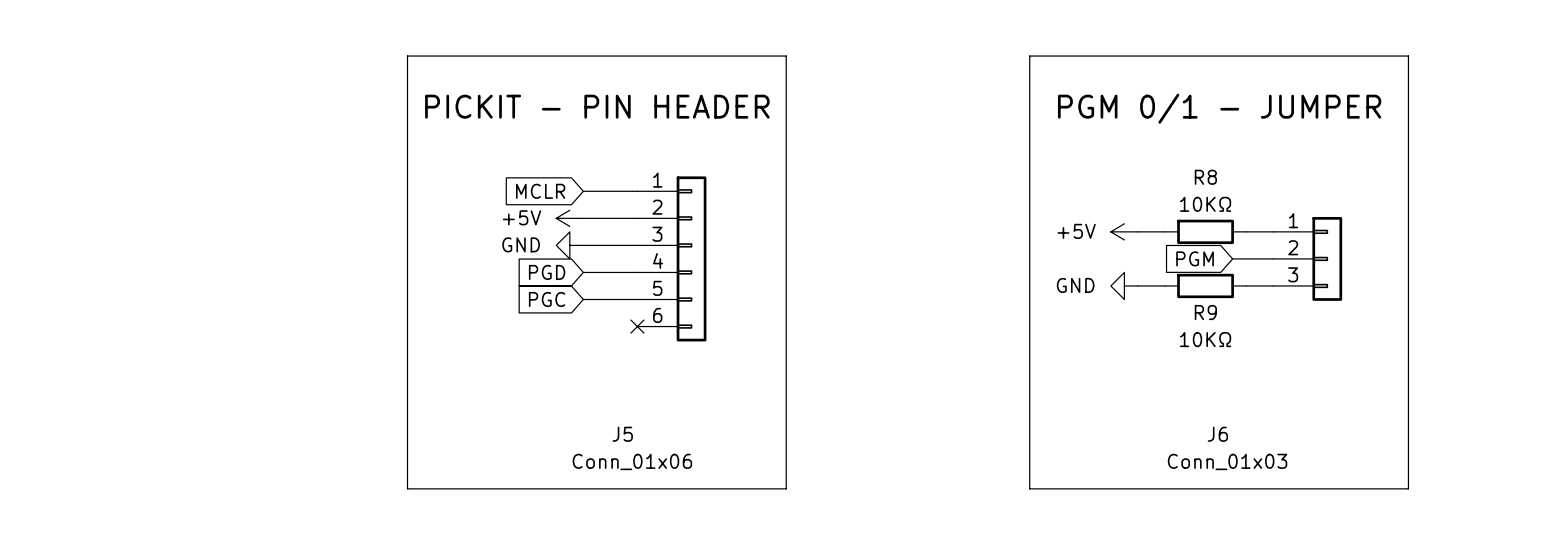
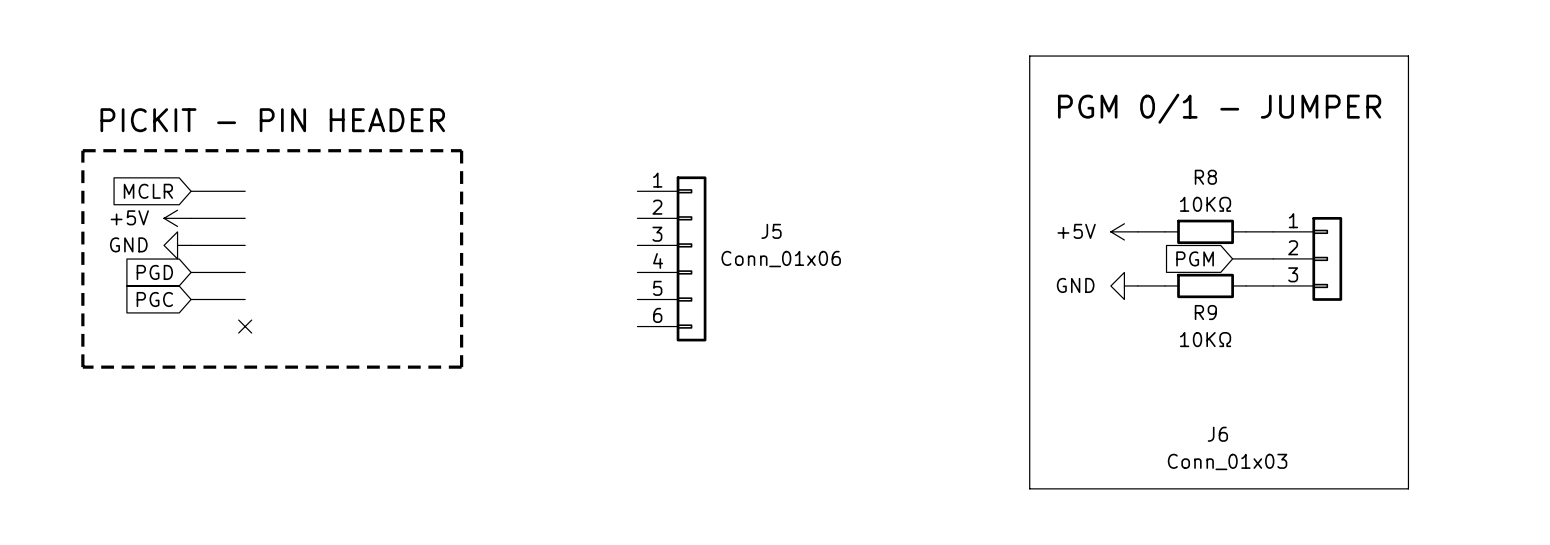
line: (407, 56) (786, 56) (786, 488) (407, 488) (407, 56) -> none
text: PICKIT - PIN HEADER (597, 106) -> none
text: none -> PICKIT - PIN HEADER (272, 120)
line: none -> (82, 150) (461, 150) (461, 367) (82, 367) (82, 150)
global label: none -> MCLR (148, 191)
wire: none -> (191, 191) (245, 191)
global label: MCLR (540, 191) -> none
wire: (583, 191) (637, 191) -> none
power symbol: none -> +5V (177, 218)
wire: none -> (191, 218) (245, 218)
power symbol: +5V (569, 218) -> none
wire: (583, 218) (637, 218) -> none
power symbol: none -> GND (177, 245)
wire: none -> (191, 245) (245, 245)
power symbol: GND (569, 245) -> none
wire: (583, 245) (637, 245) -> none
global label: none -> PGD (154, 272)
wire: none -> (191, 272) (245, 272)
global label: PGD (547, 272) -> none
wire: (583, 272) (637, 272) -> none
global label: none -> PGC (154, 299)
wire: none -> (191, 299) (245, 299)
global label: PGC (547, 299) -> none
wire: (583, 299) (637, 299) -> none
no-connect mark: none -> (245, 326)
no-connect mark: (637, 326) -> none
J5 name position: J5 (622, 434) -> J5 (771, 231)
J5 value position: Conn_01x06 (632, 461) -> Conn_01x06 (781, 259)

